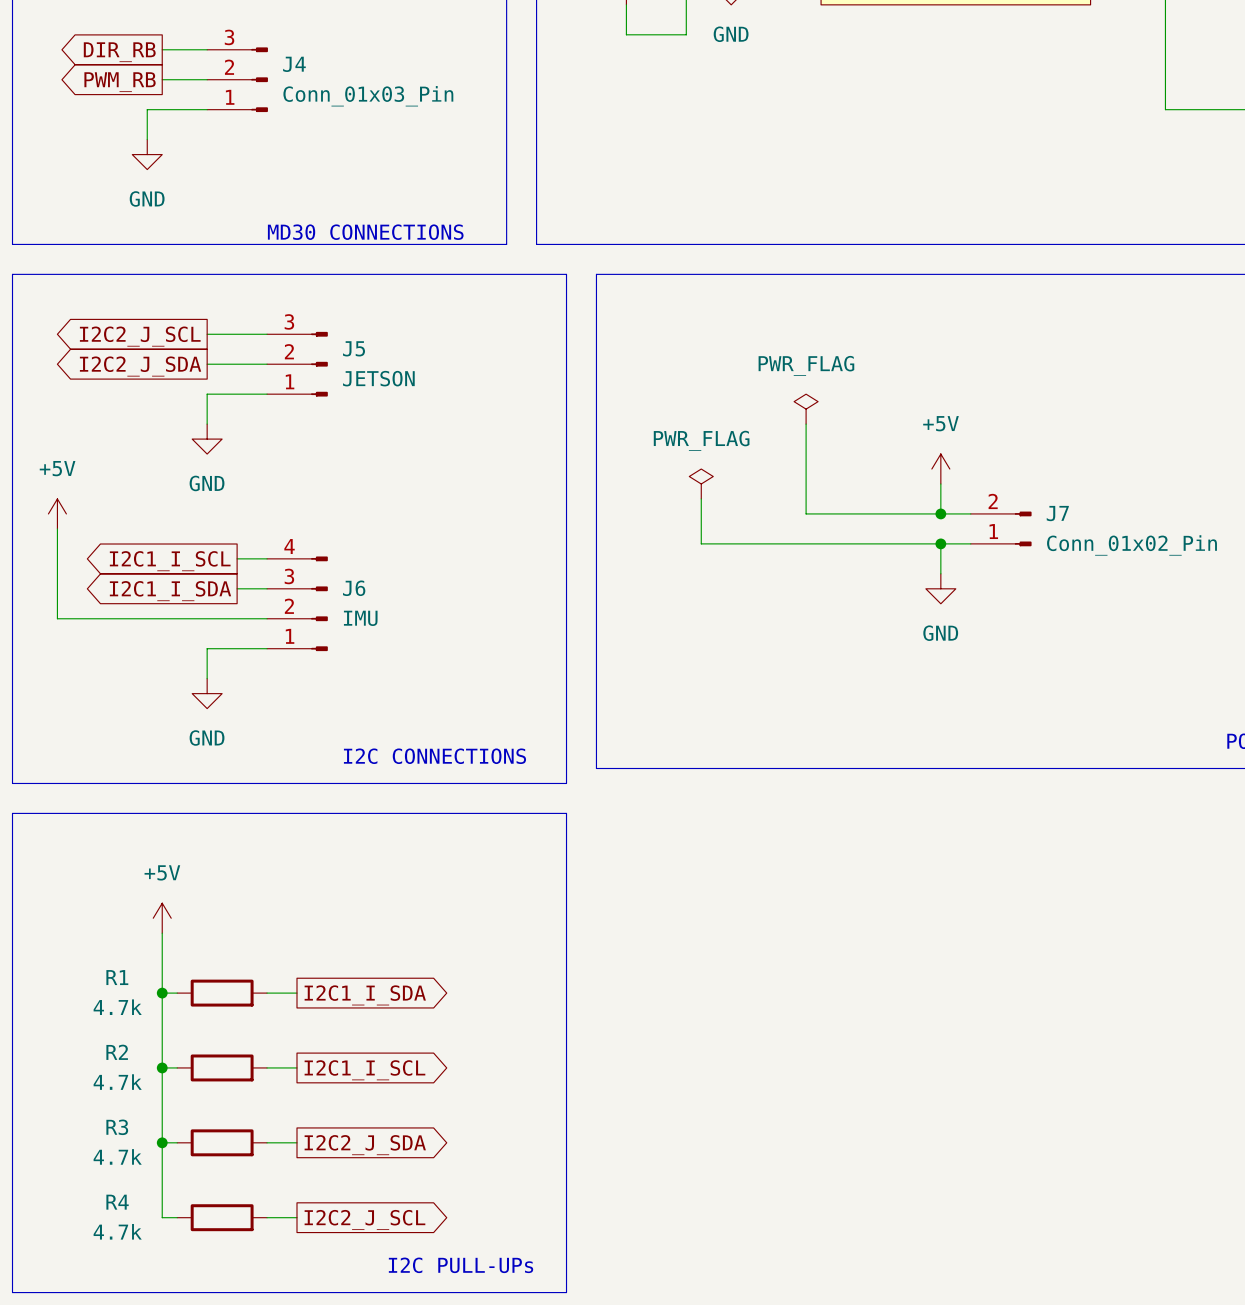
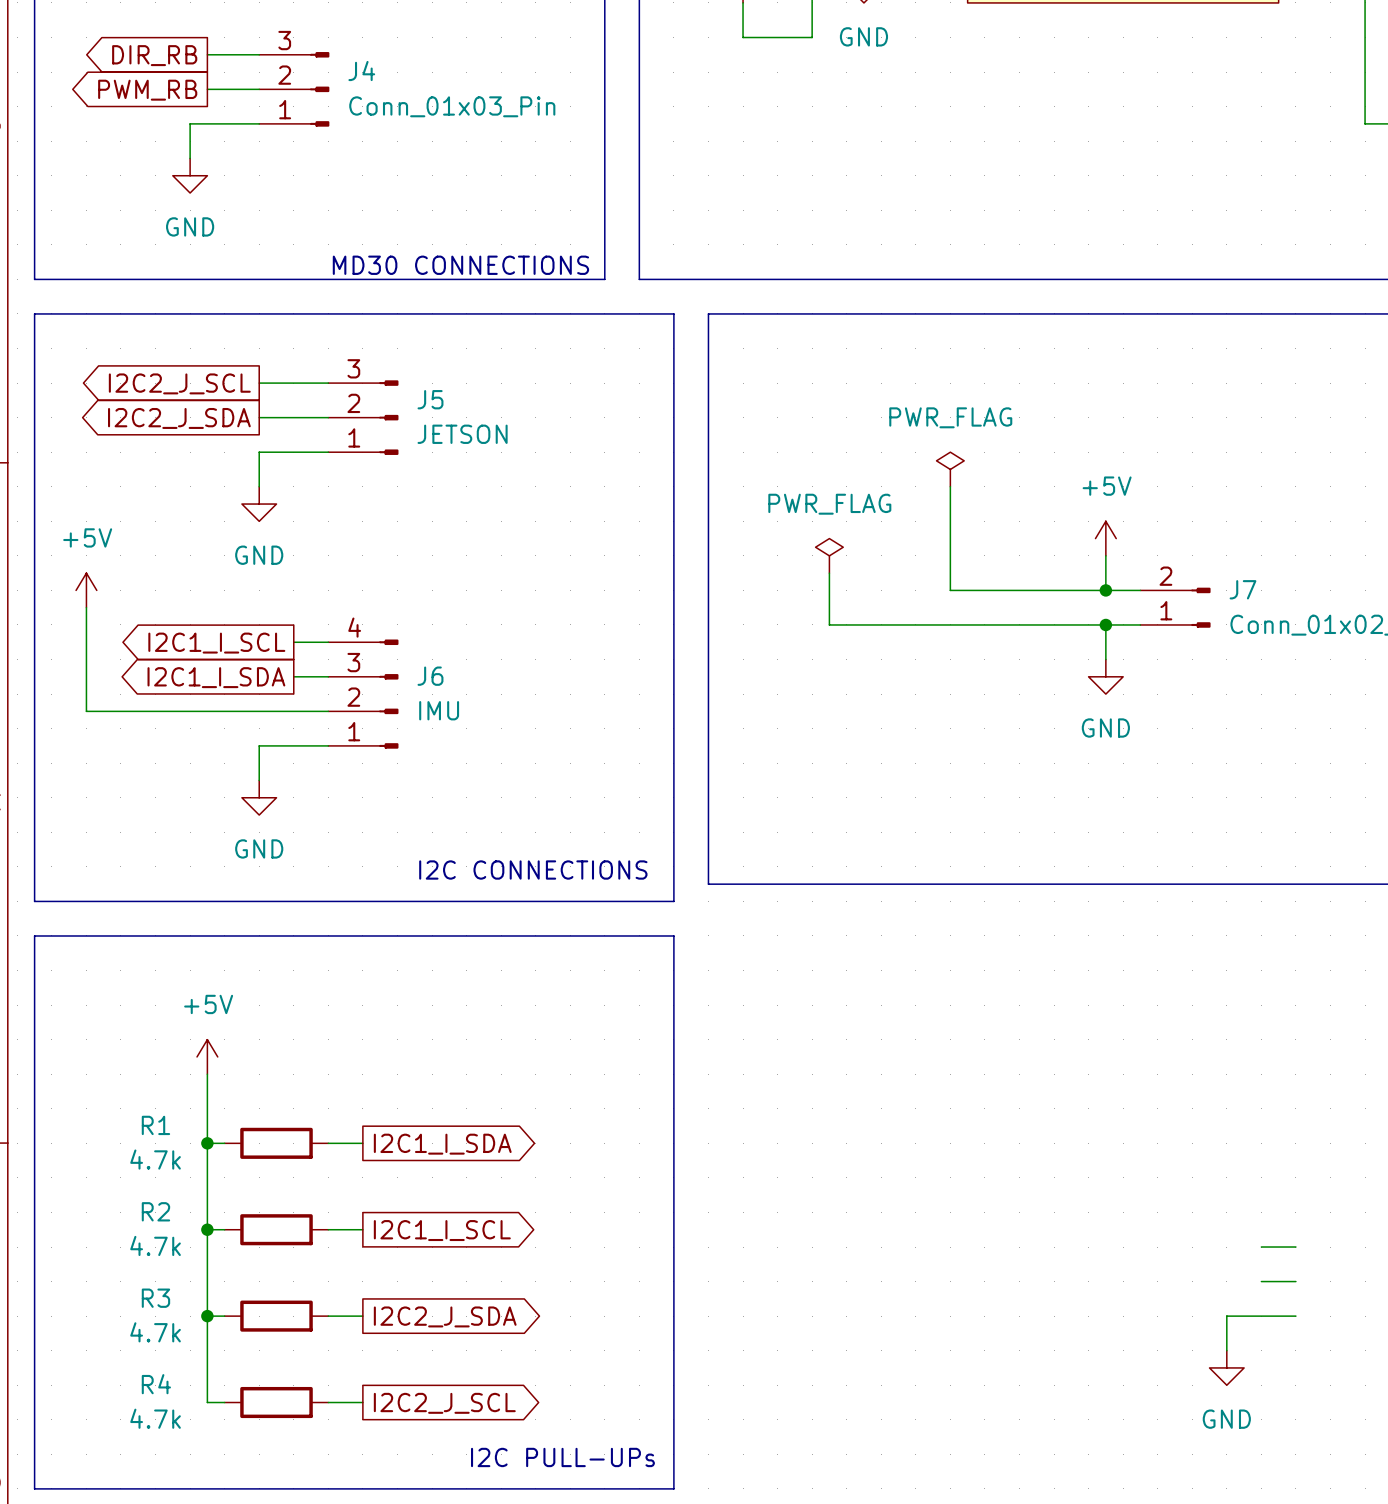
wire: none -> (1261, 1247) (1295, 1247)
wire: none -> (1261, 1281) (1295, 1281)
wire: none -> (1295, 1316) (1226, 1316) (1226, 1350)
power symbol: none -> GND (1226, 1367)

